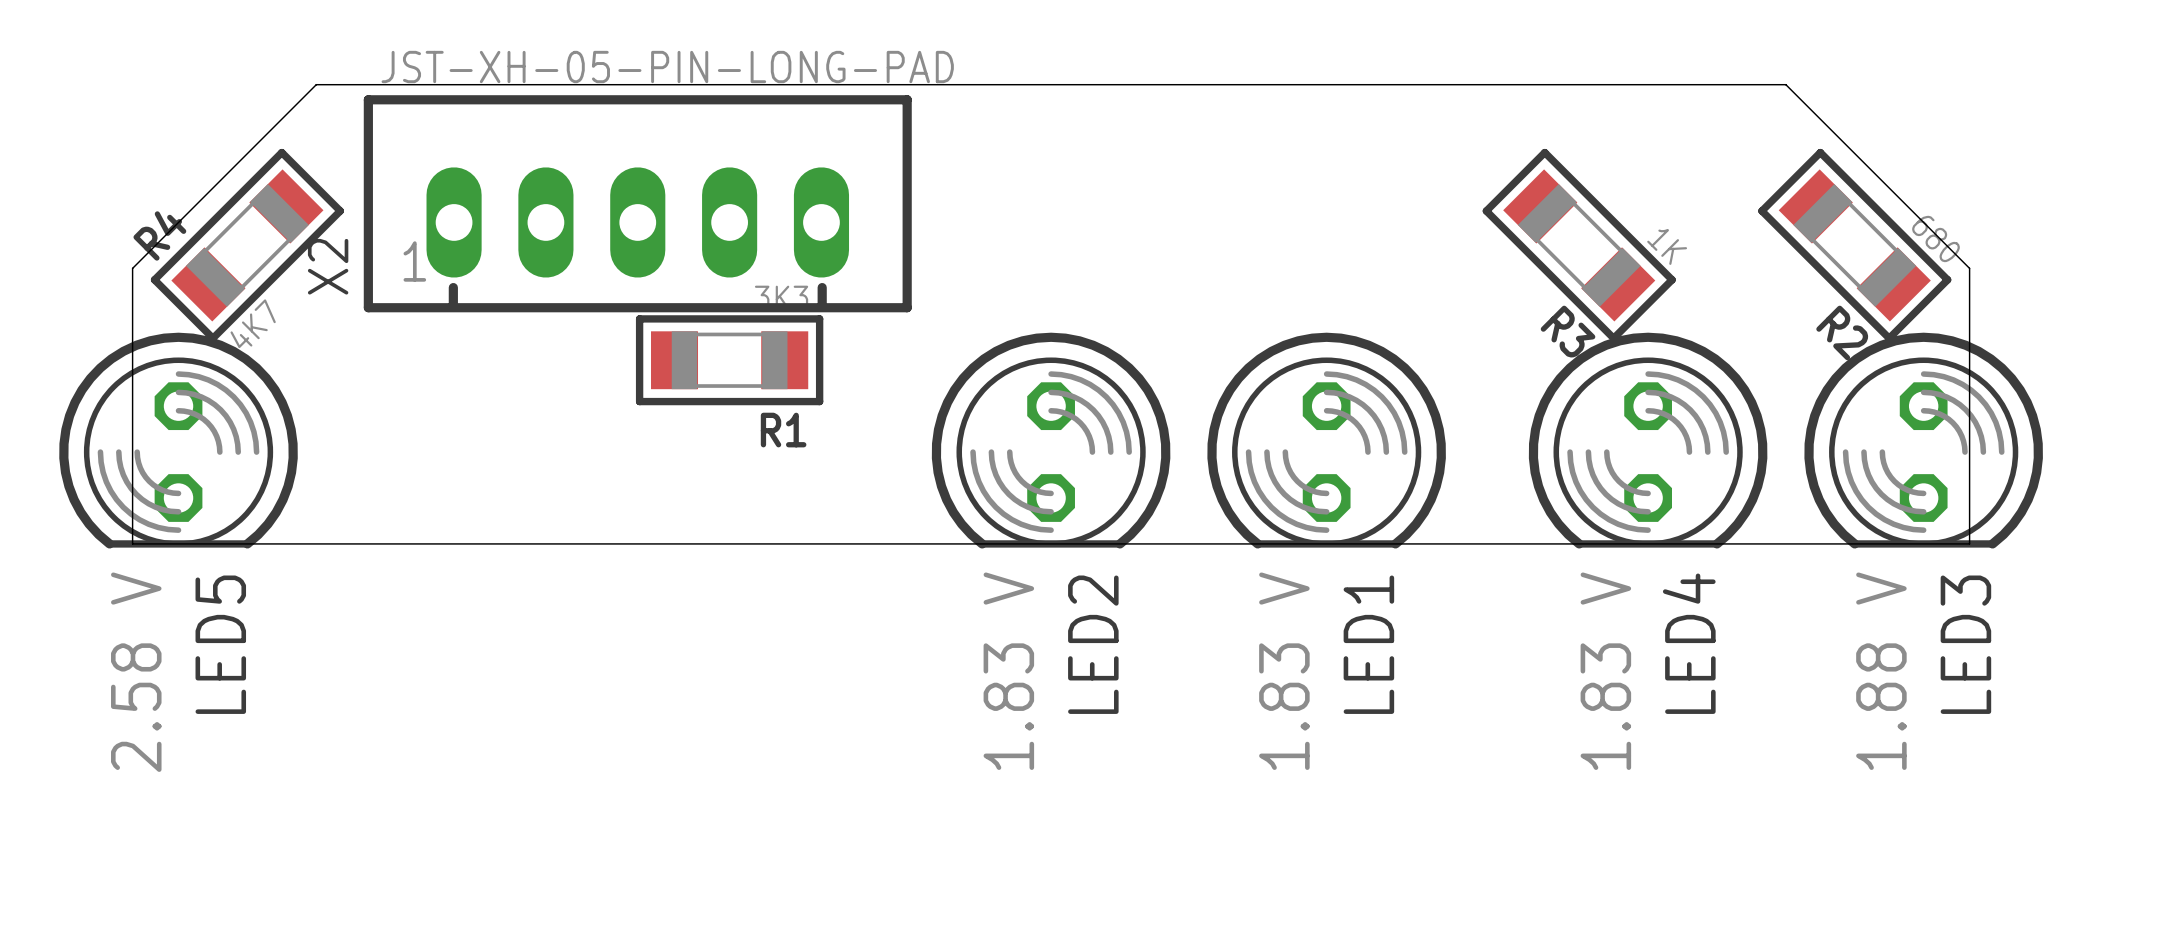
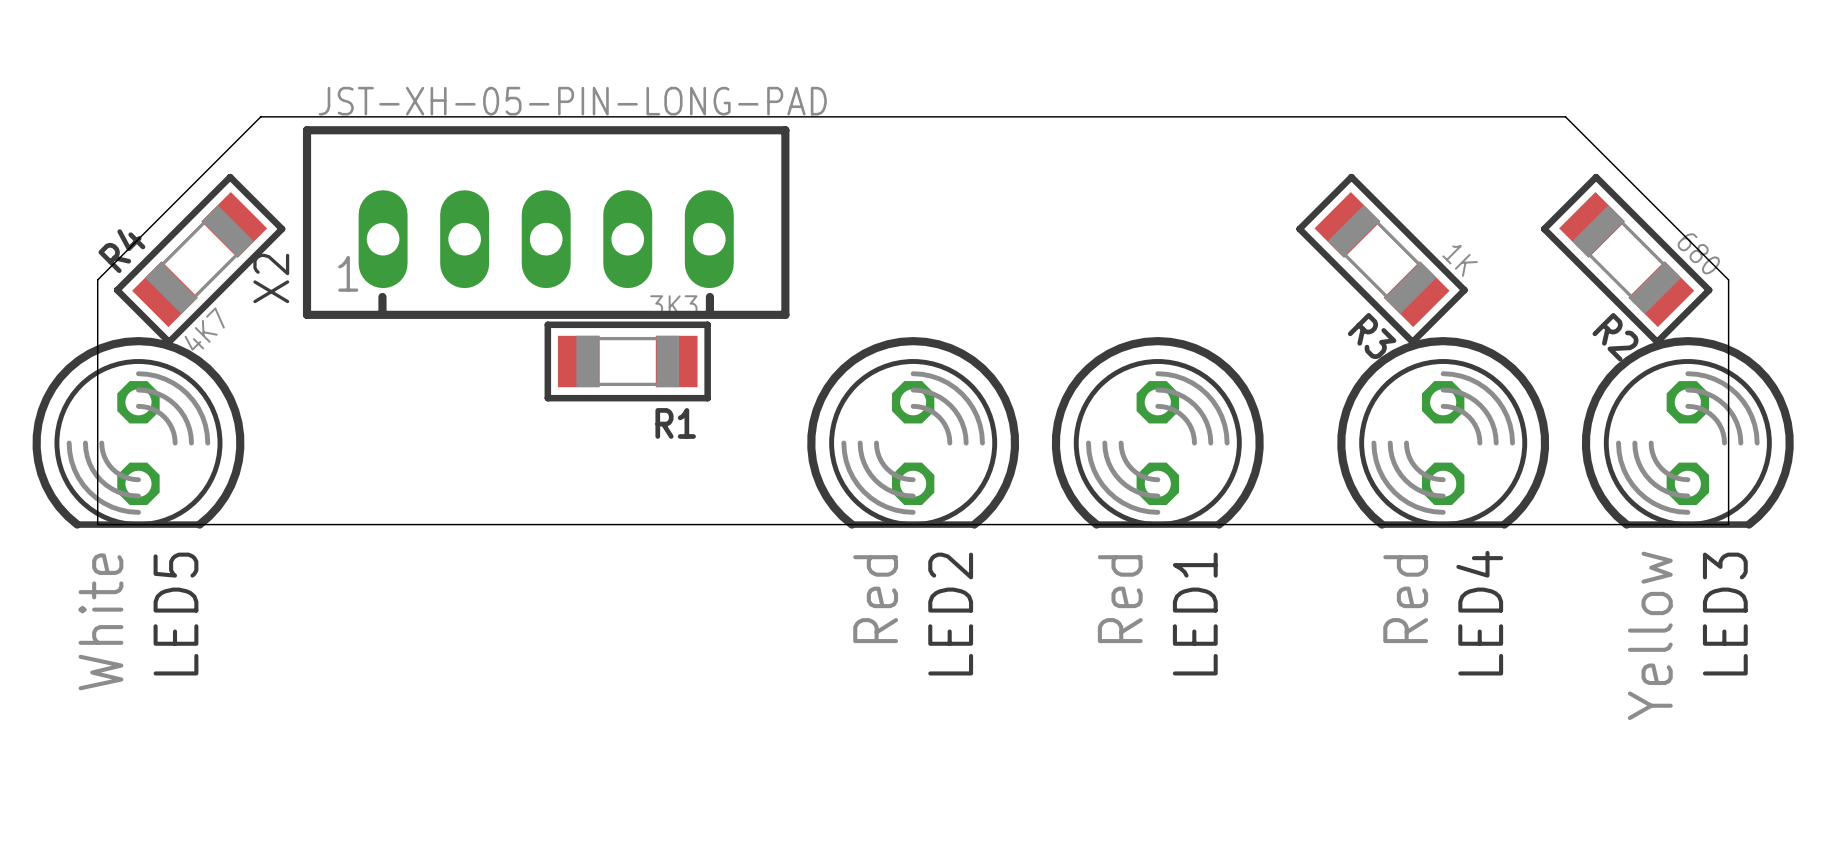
LED2 value: 1.83 V (1008, 671) -> Red (875, 599)
LED1 value: 1.83 V (1284, 671) -> Red (1120, 599)
LED4 value: 1.83 V (1605, 671) -> Red (1405, 599)
LED3 value: 1.88 V (1881, 671) -> Yellow (1650, 635)
LED5 value: 2.58 V (136, 672) -> White (100, 621)

